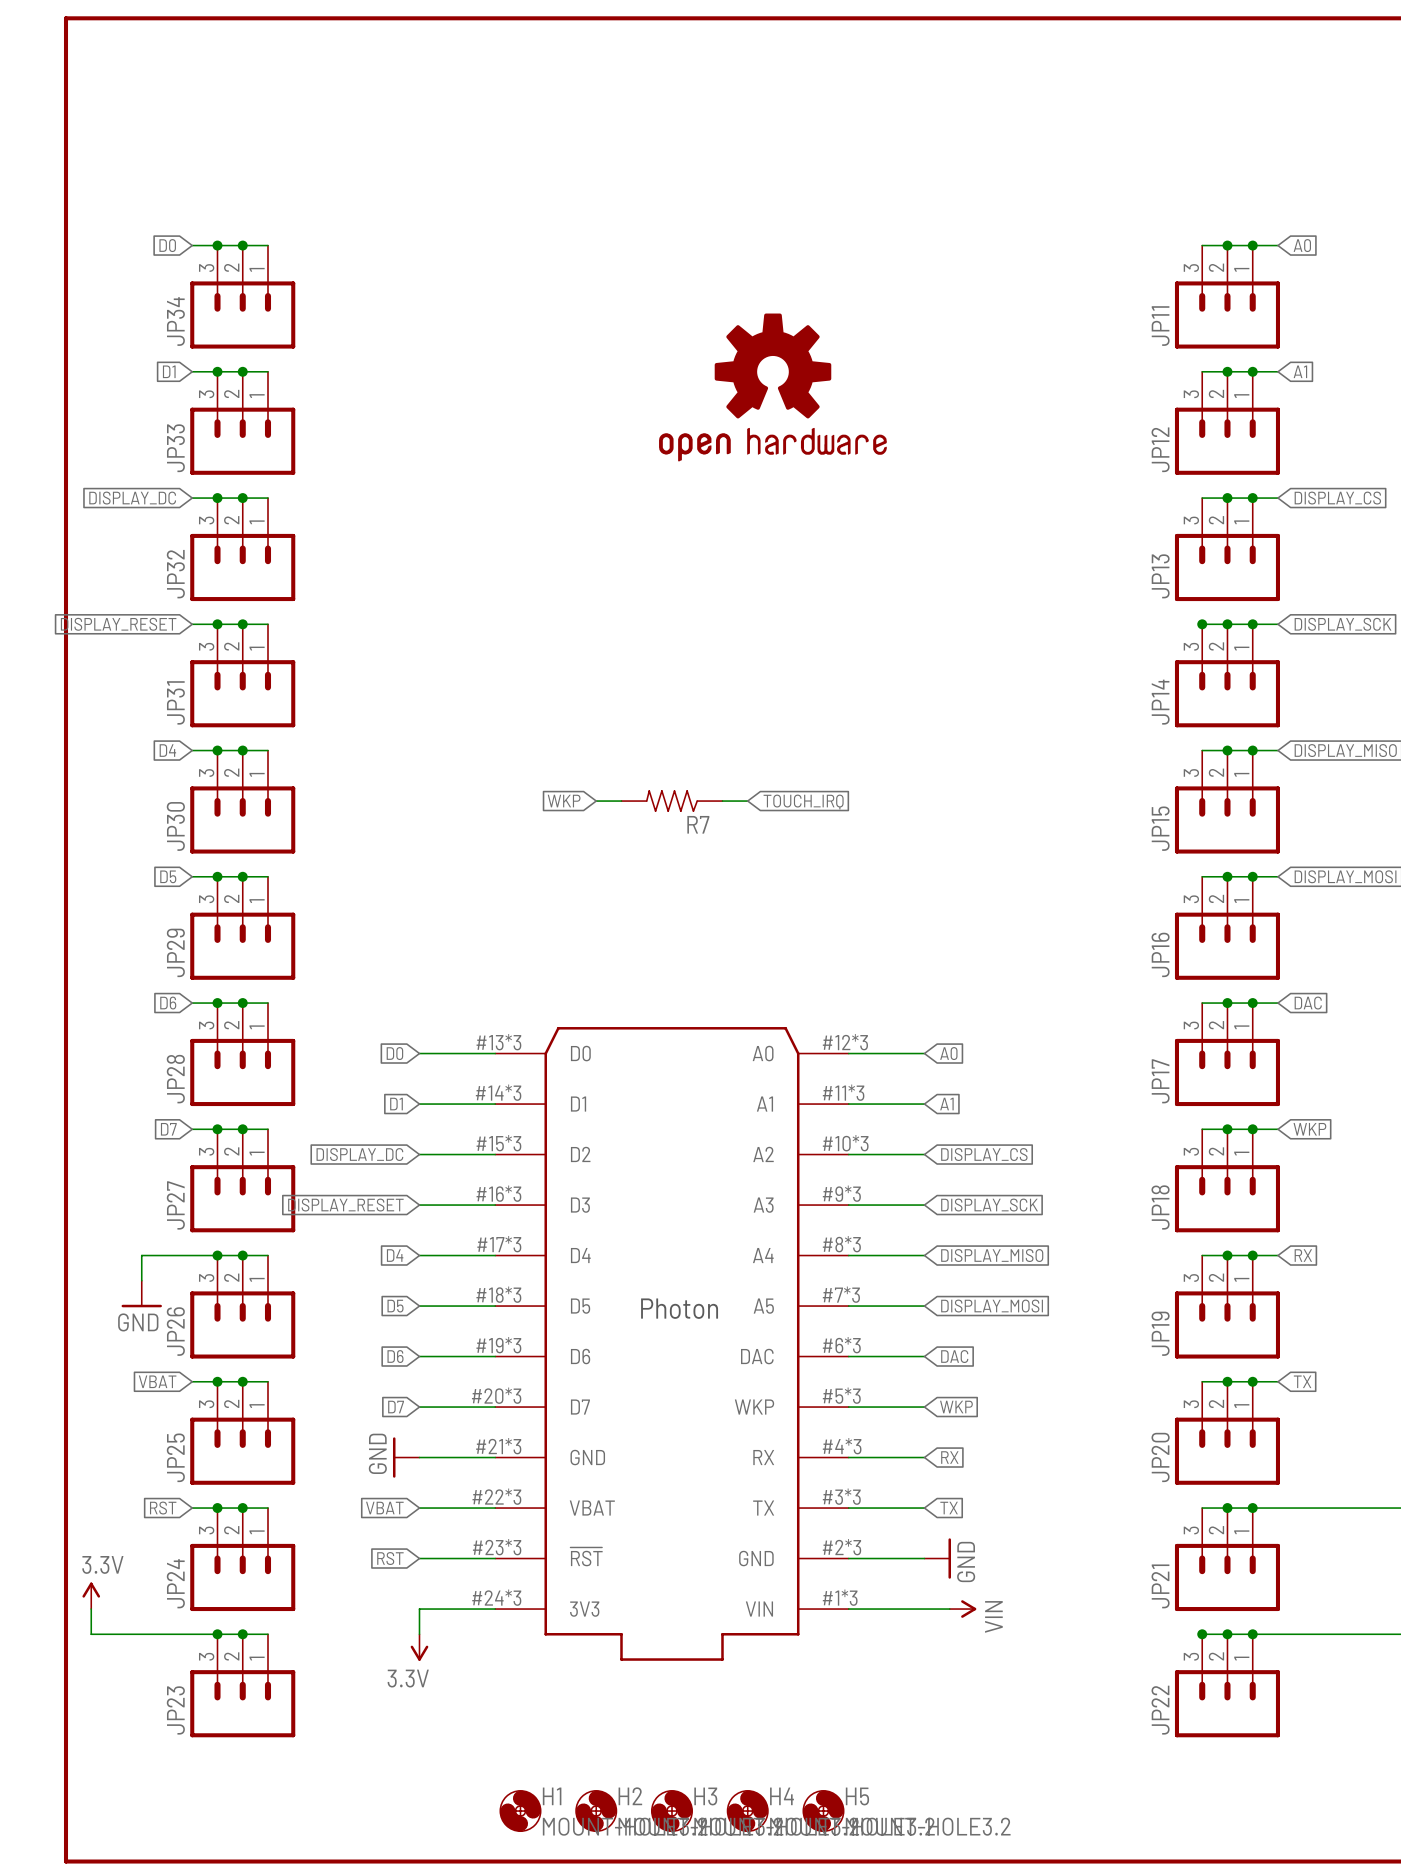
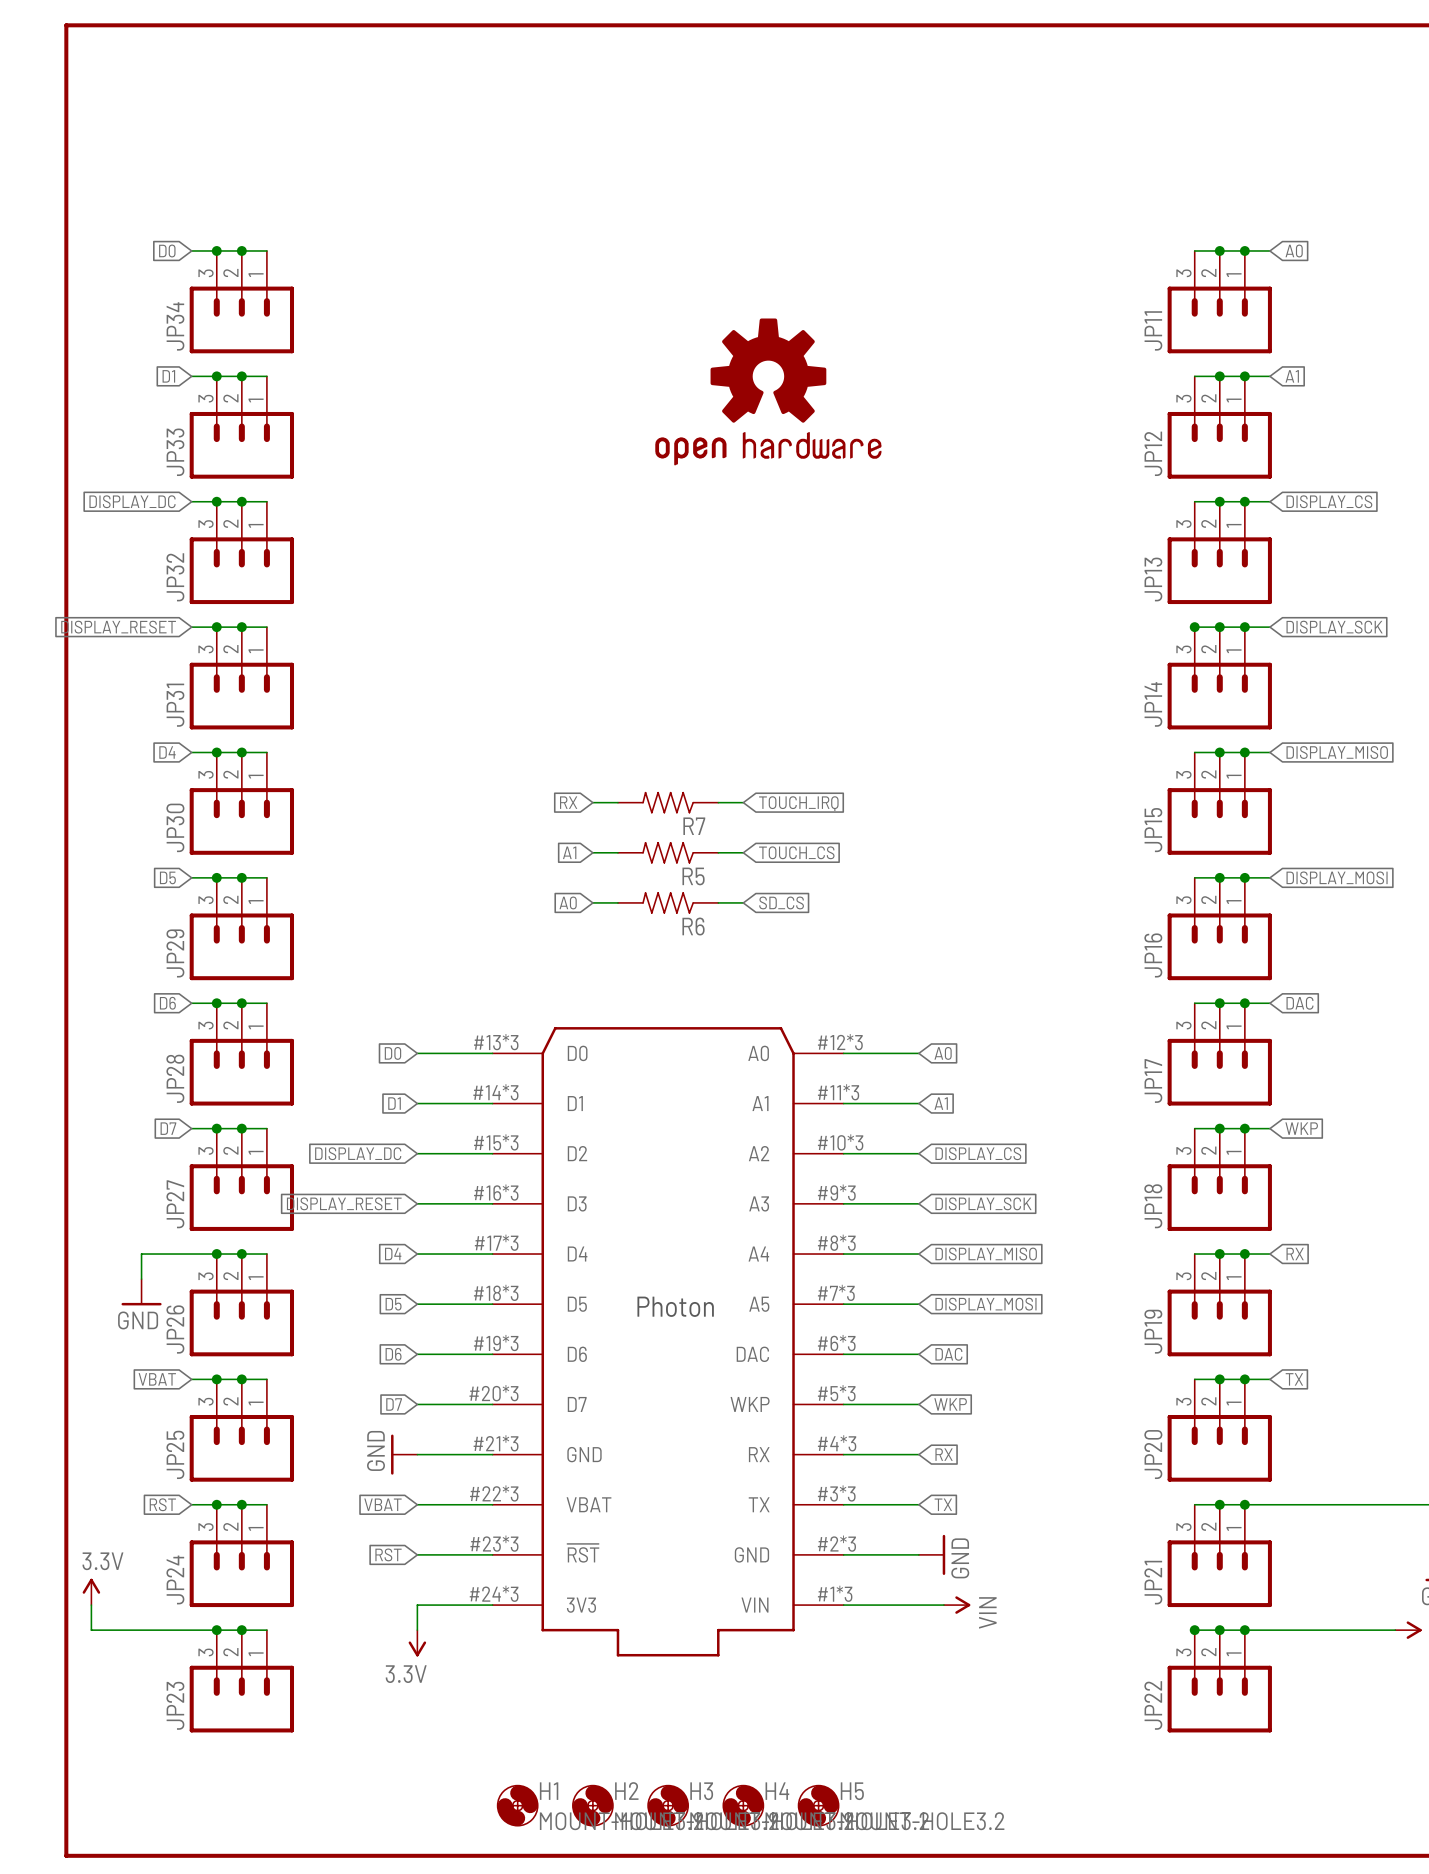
global label: WKP (564, 801) -> RX (568, 802)
global label: none -> A1 (569, 852)
wire: none -> (592, 852) (617, 852)
R5: none -> (668, 852)
wire: none -> (718, 852) (743, 852)
global label: none -> TOUCH_CS (796, 852)
global label: none -> A0 (568, 902)
wire: none -> (592, 902) (617, 902)
R6: none -> (668, 902)
wire: none -> (718, 902) (743, 902)
global label: none -> SD_CS (781, 902)

